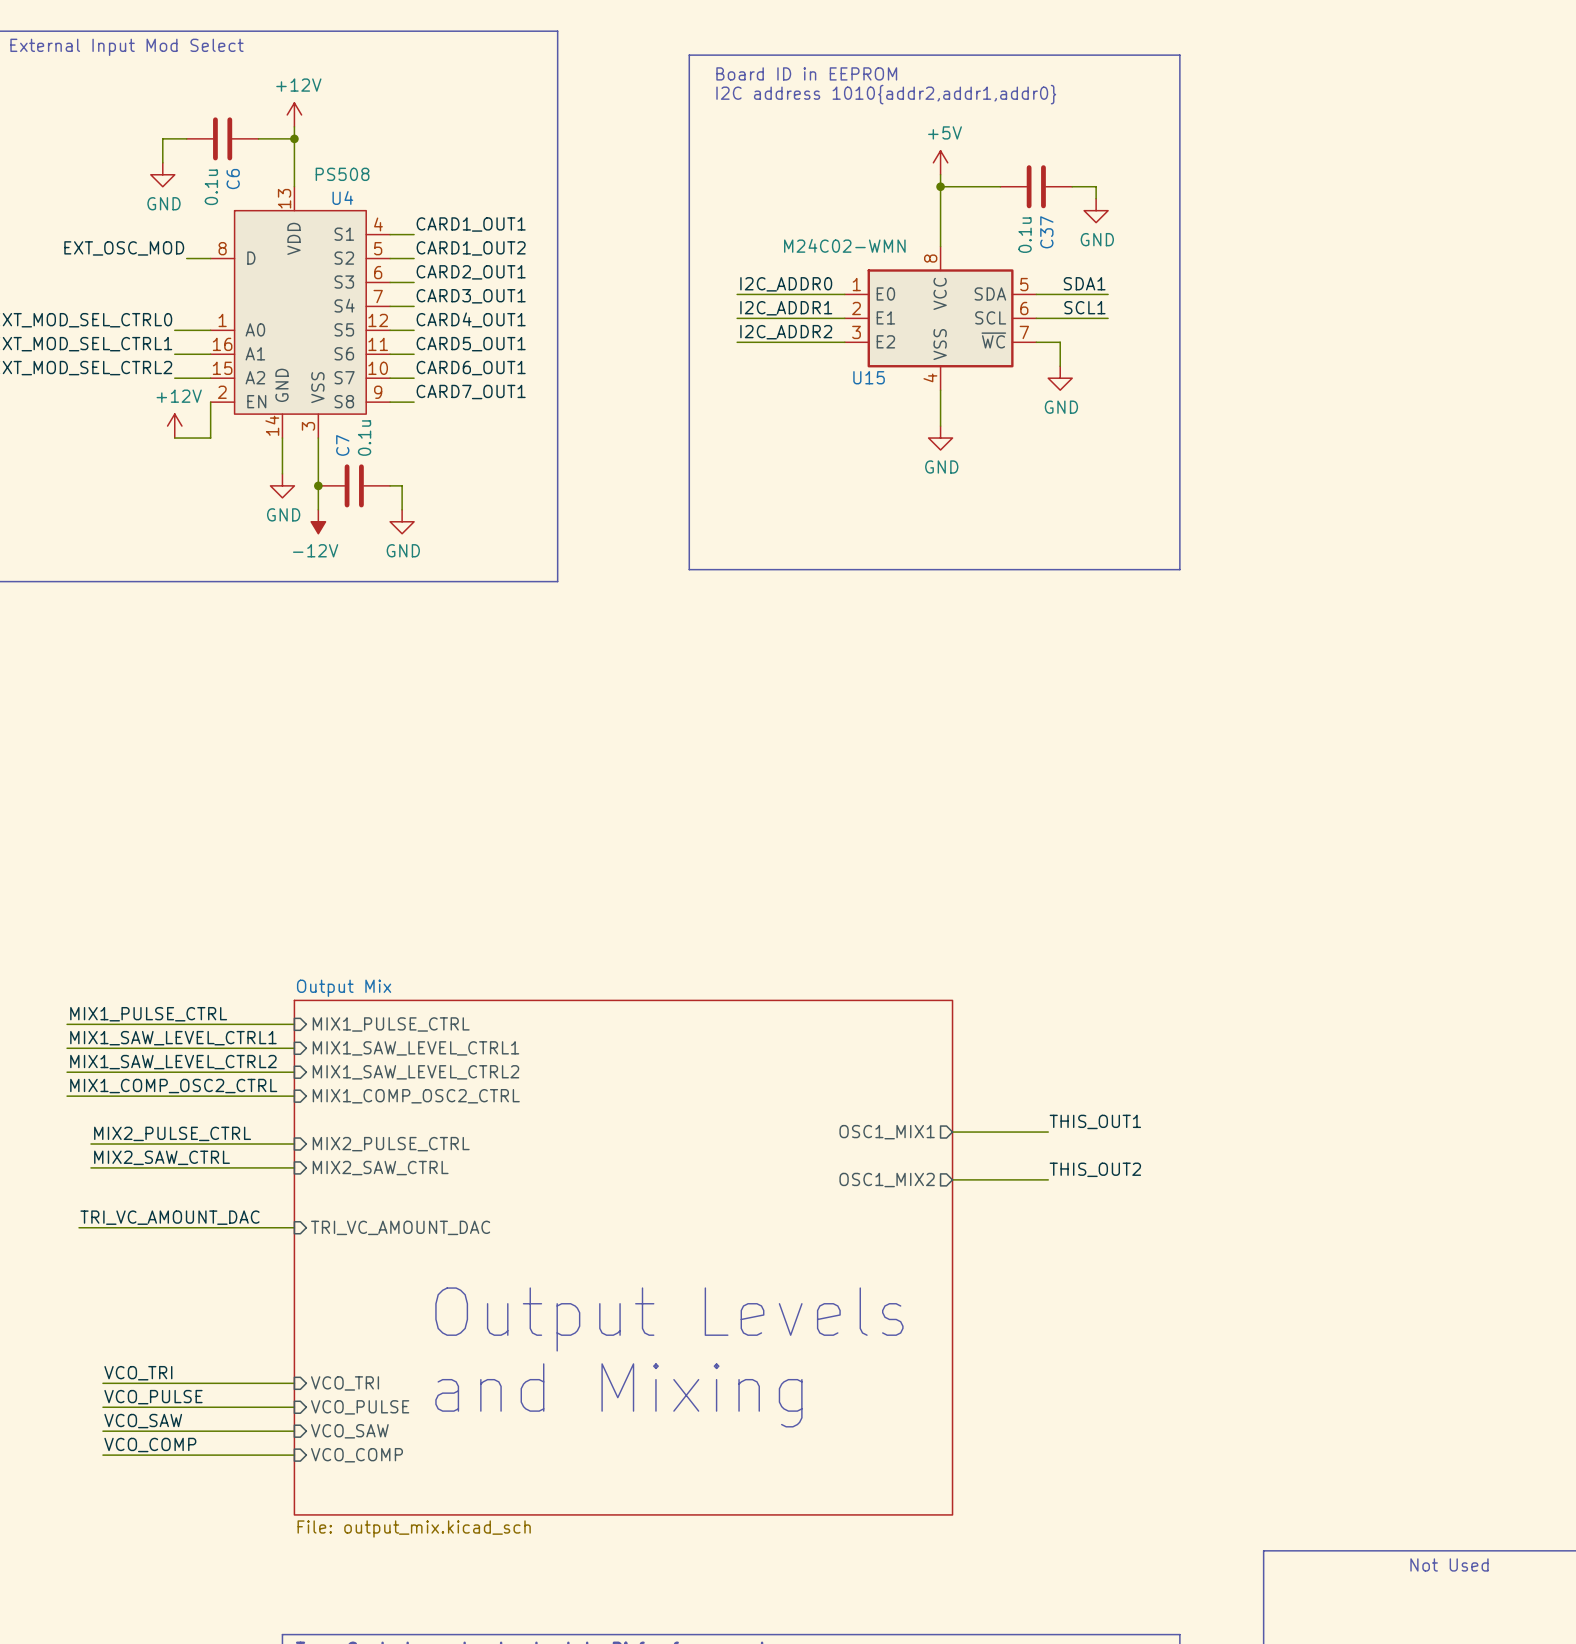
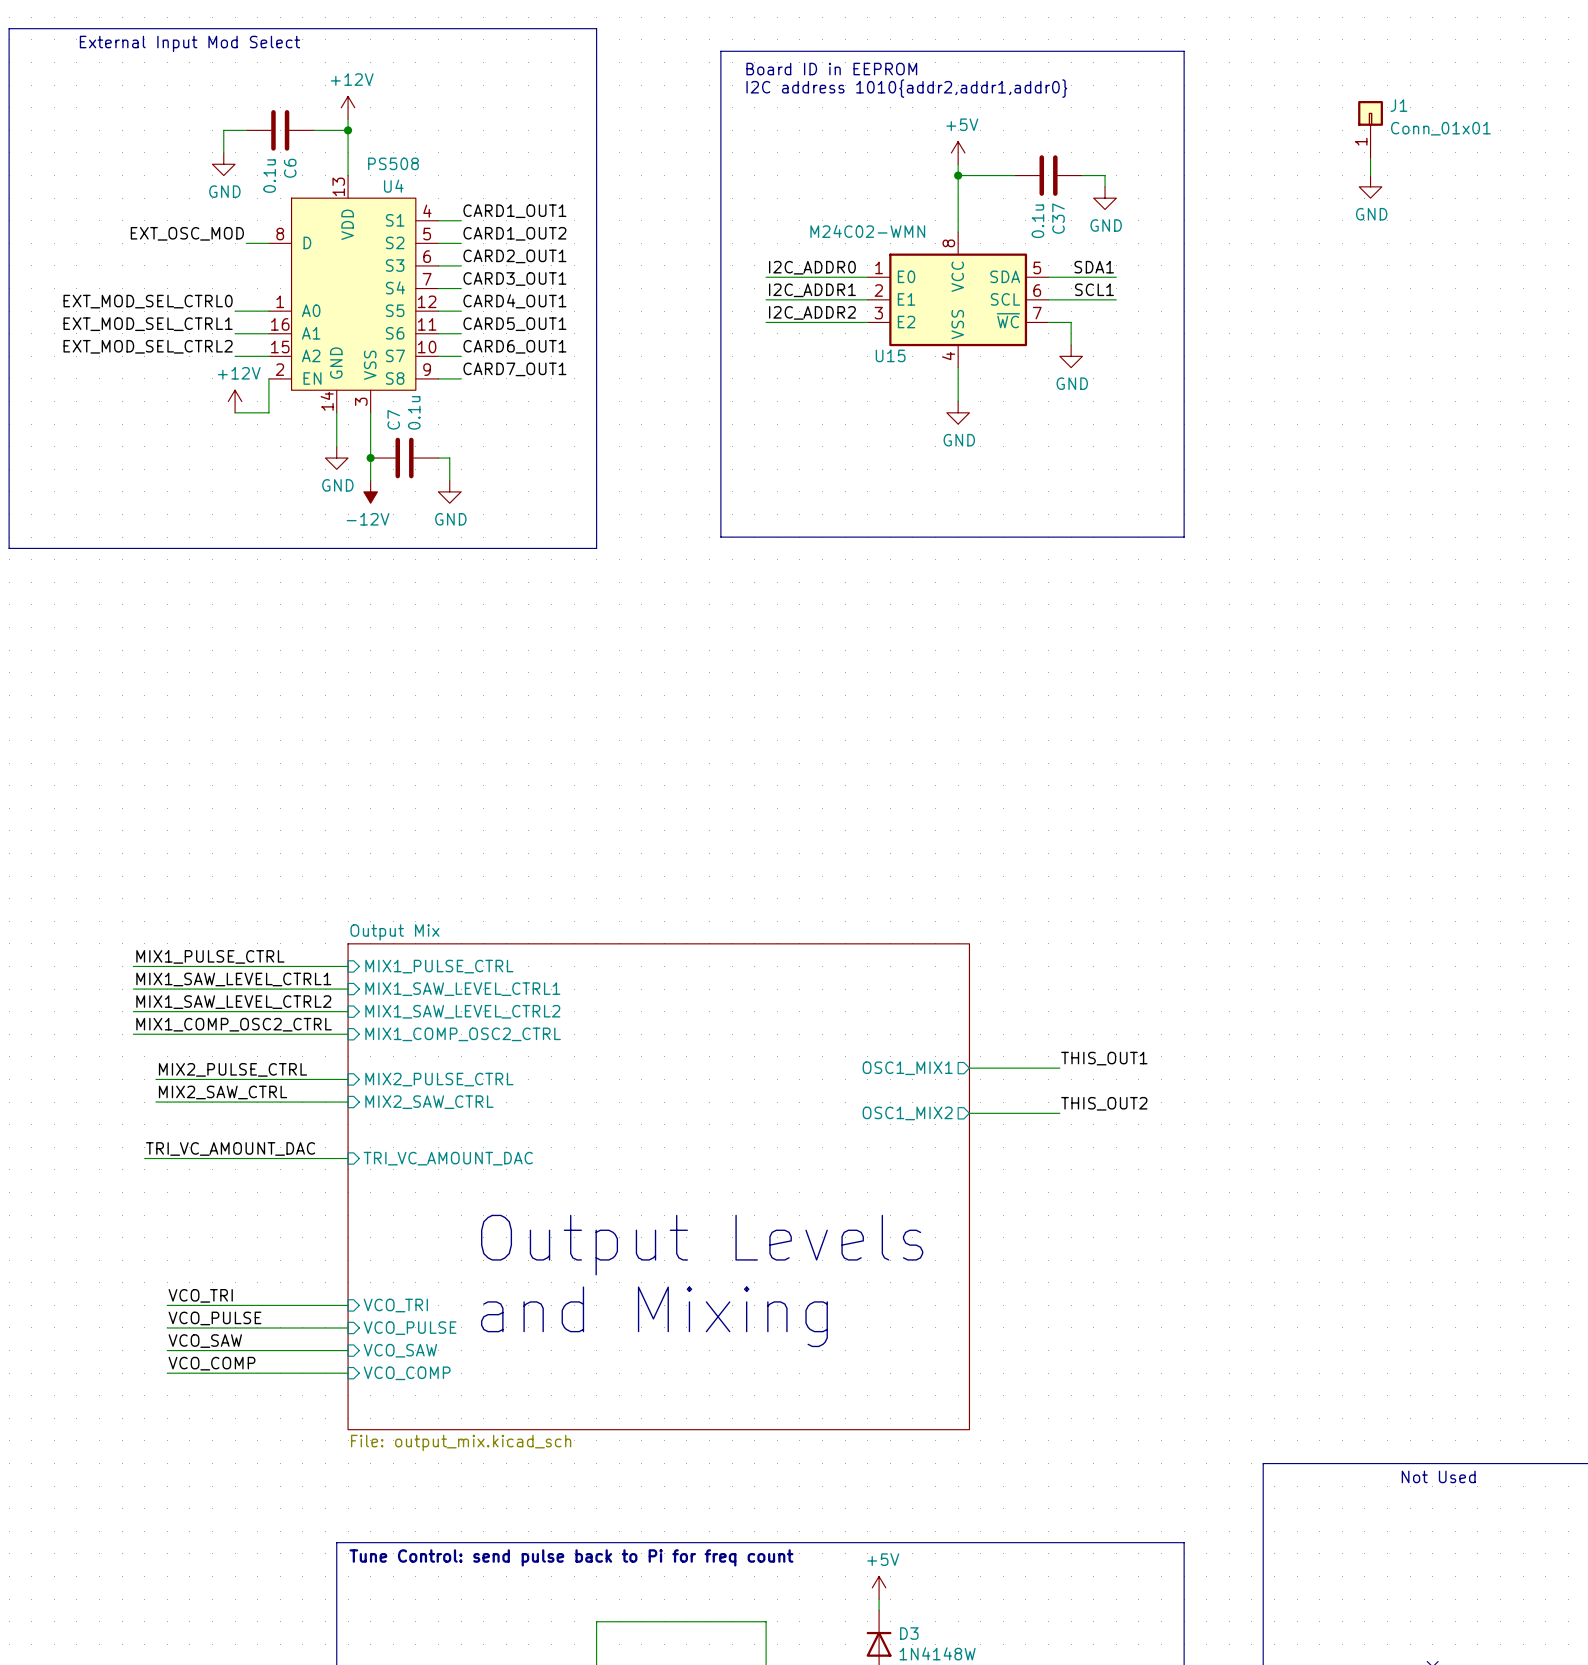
J1: none -> Conn_01x01 (1370, 129)
wire: none -> (1370, 158) (1370, 175)
power symbol: none -> GND (1370, 186)

